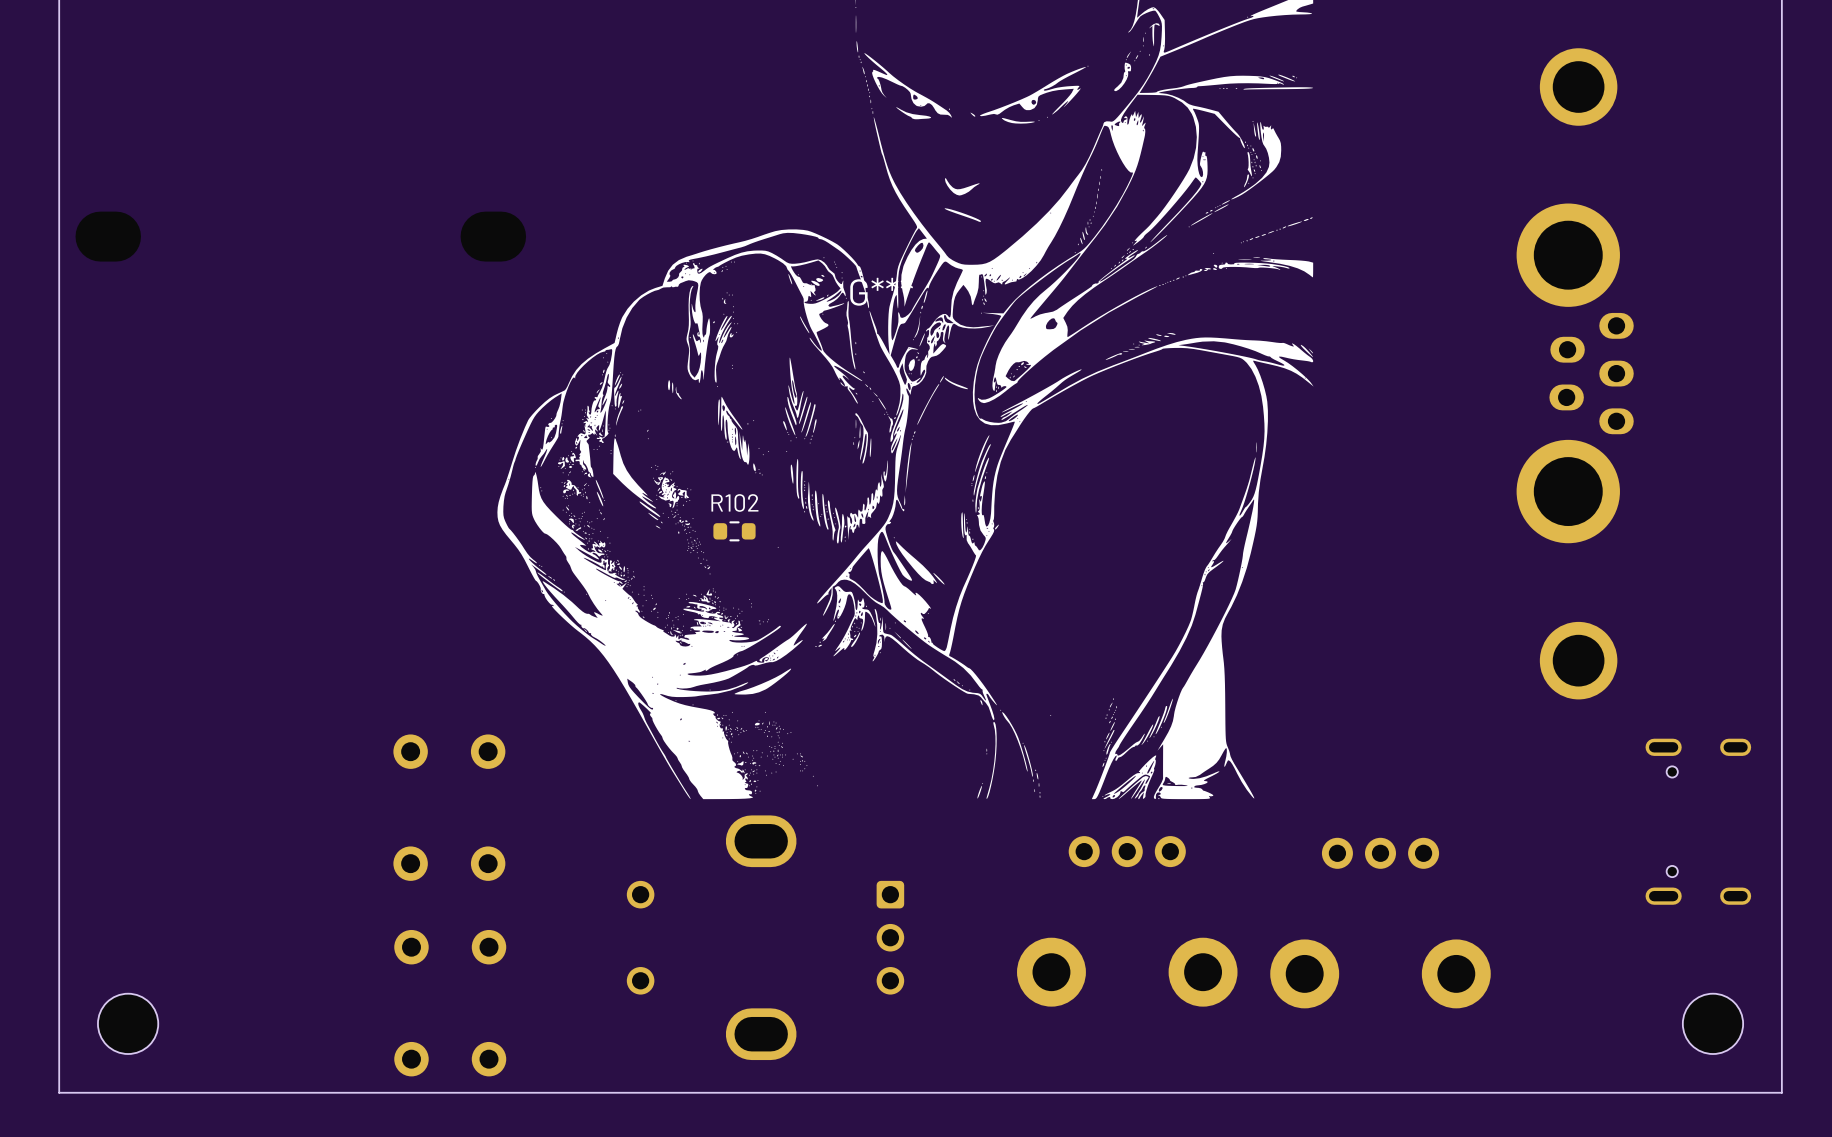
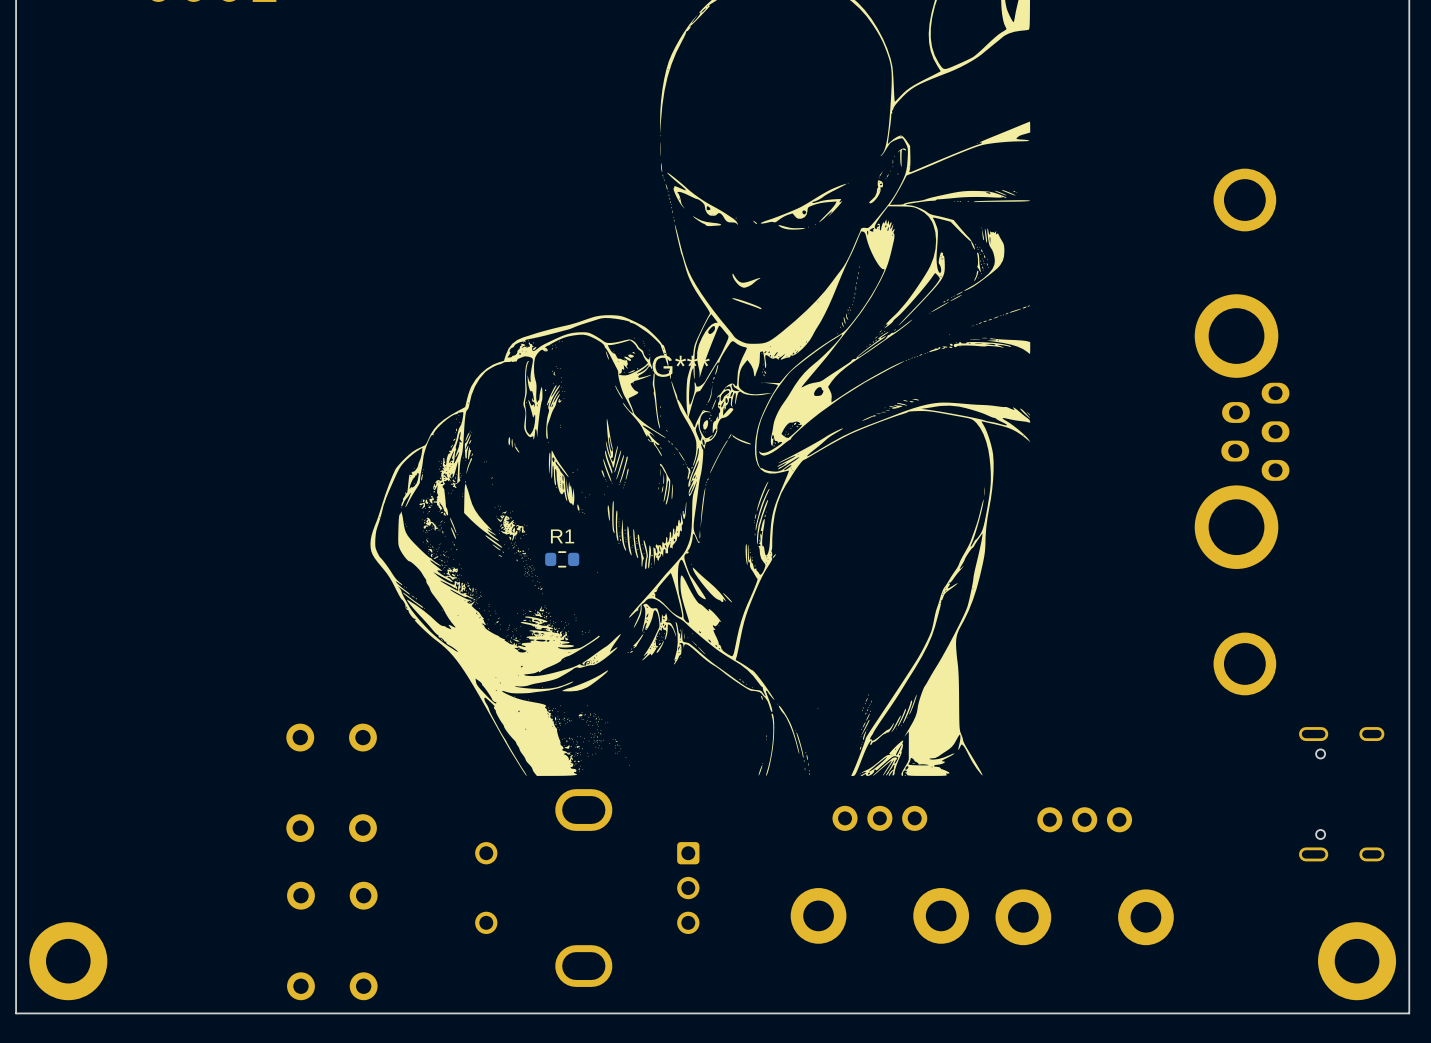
R102 name: R102 (734, 502) -> R1 (562, 536)
part footprint: [97, 993, 159, 1055] -> [29, 922, 108, 1001]
part footprint: [1682, 993, 1744, 1055] -> [1318, 922, 1397, 1001]

